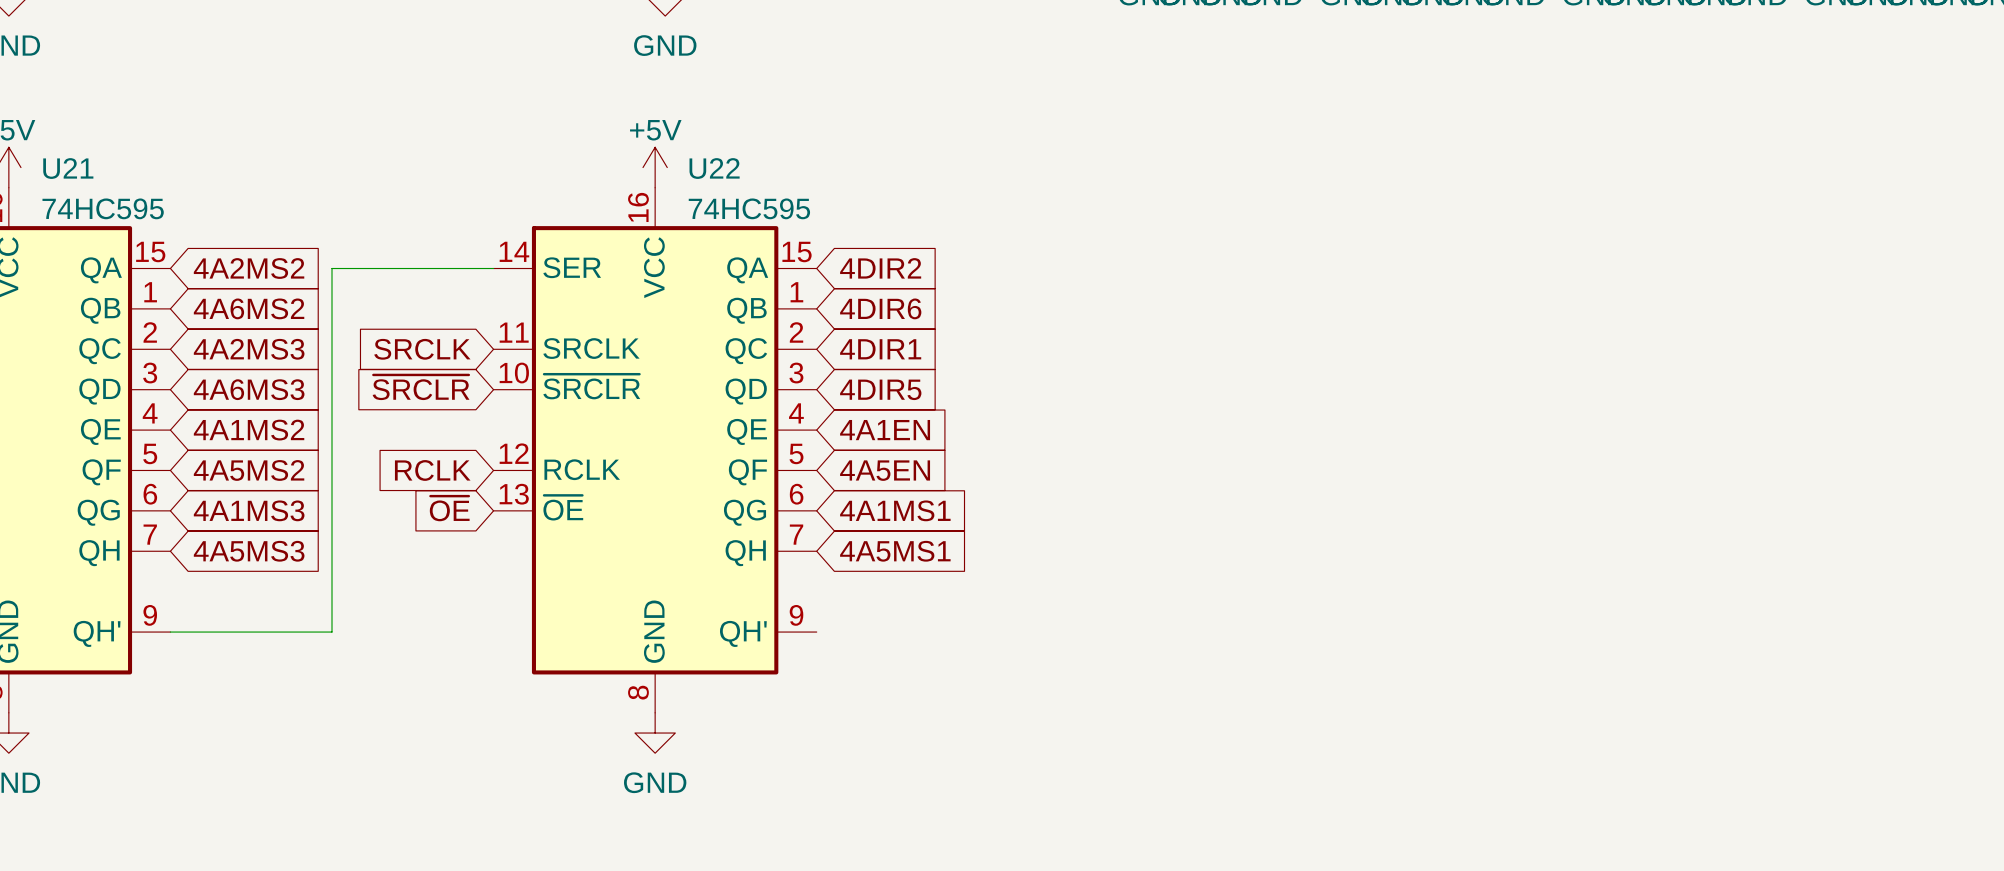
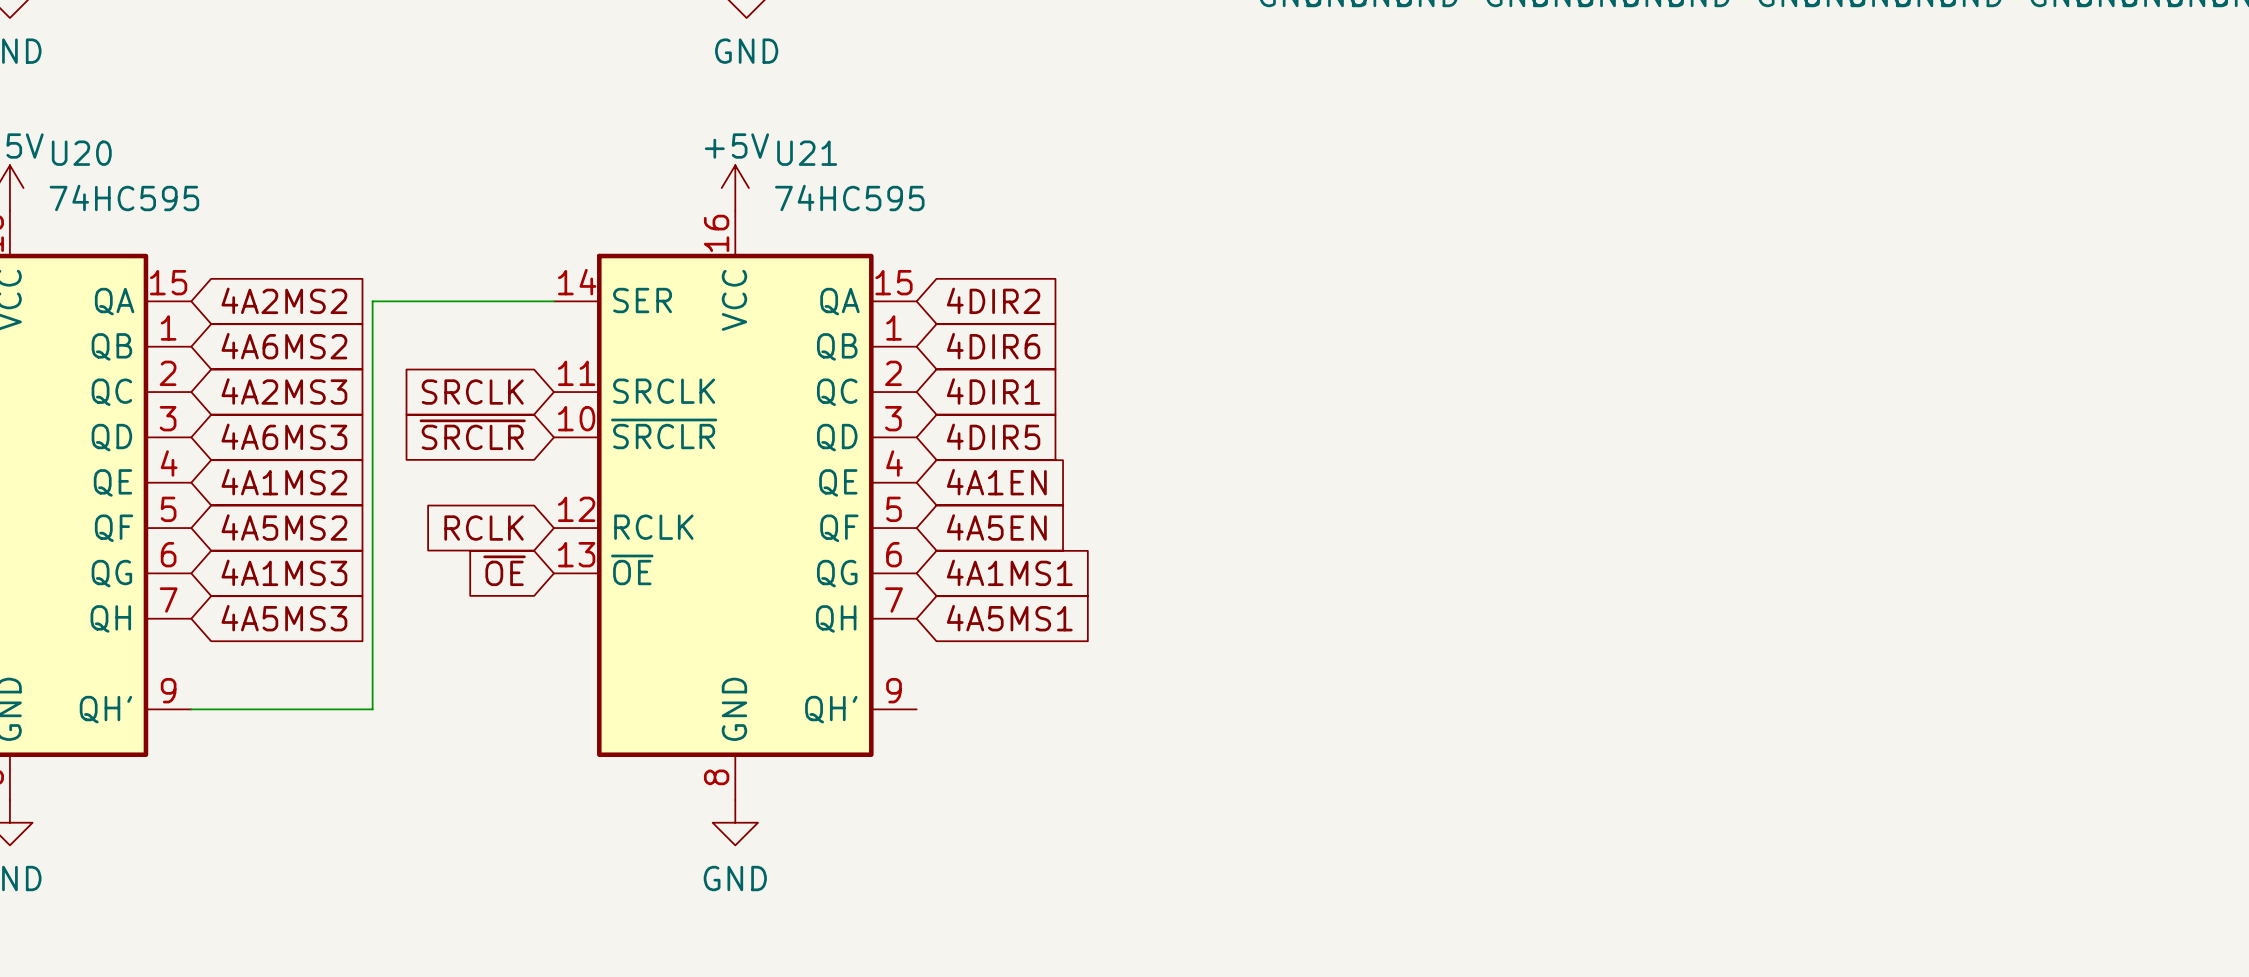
U21 name: U21 (68, 168) -> U20 (81, 153)
U22 name: U22 (714, 168) -> U21 (807, 153)
U21 value position: 74HC595 (103, 208) -> 74HC595 (124, 197)
U22 value position: 74HC595 (749, 208) -> 74HC595 (849, 197)

